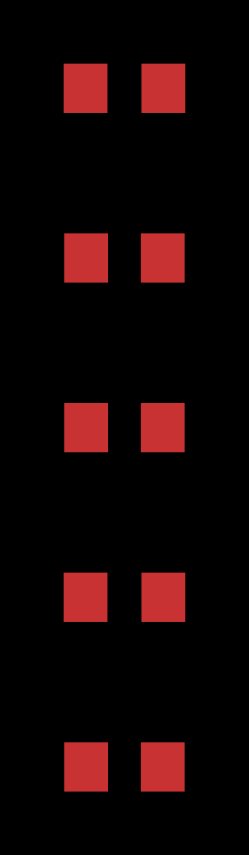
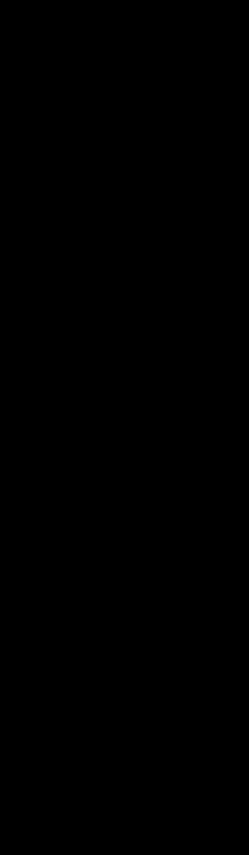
part: (124, 88) -> none
part: (124, 257) -> none
part: (124, 427) -> none
part: (124, 597) -> none
part: (124, 766) -> none

